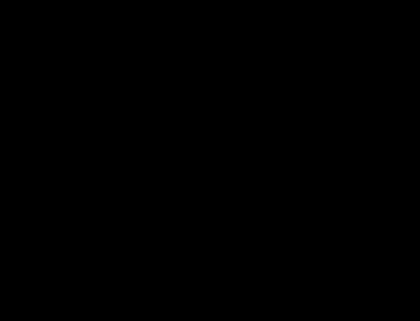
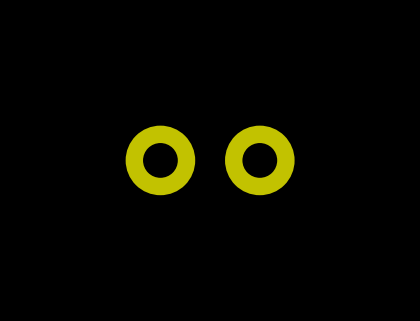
part: none -> (210, 160)

